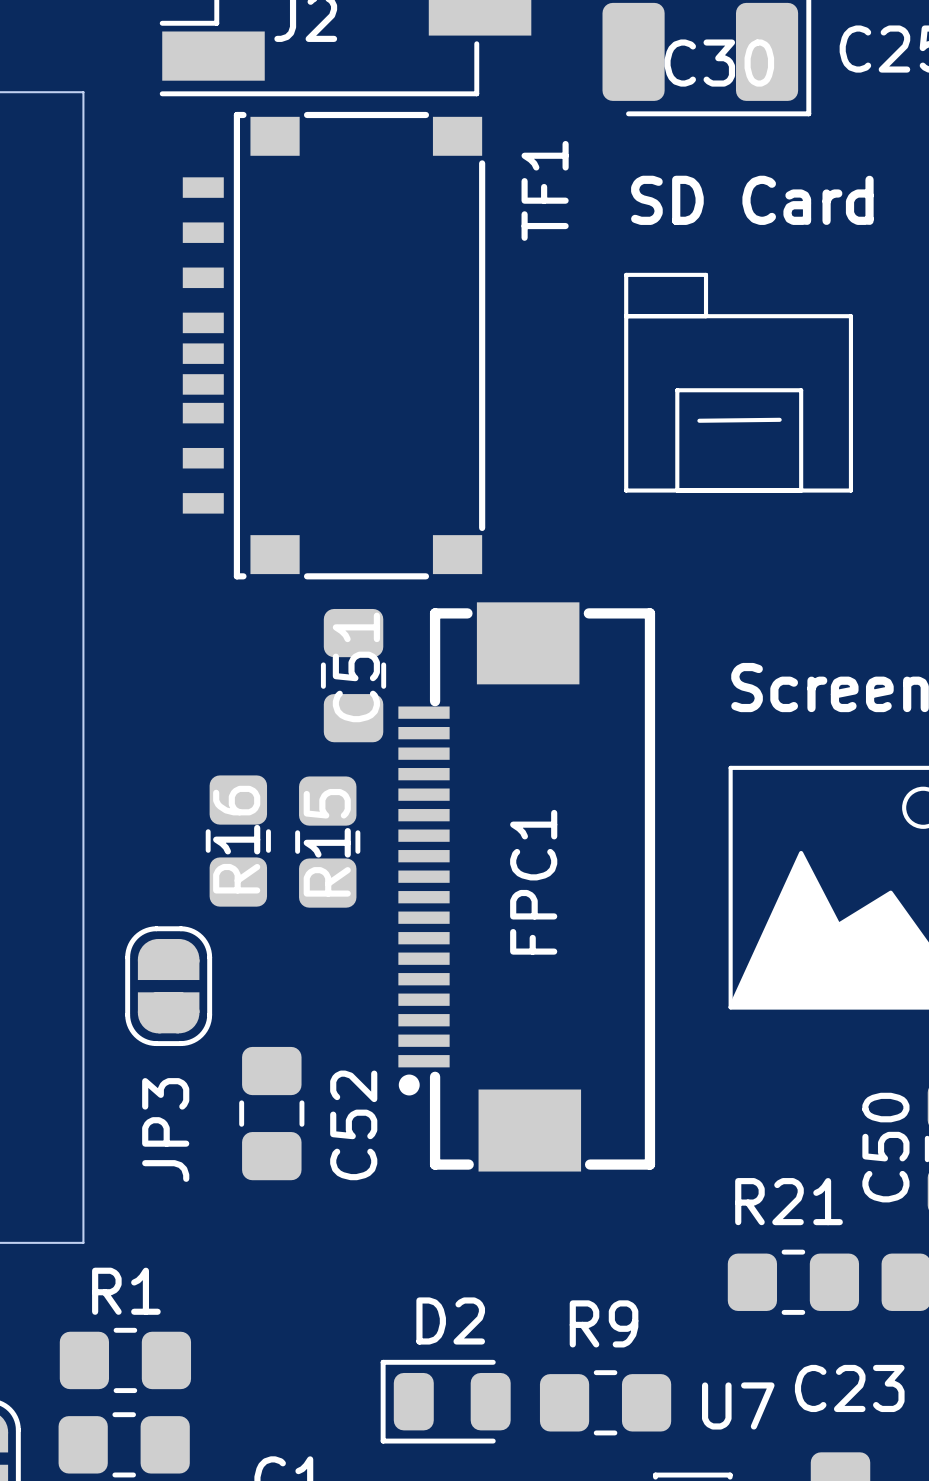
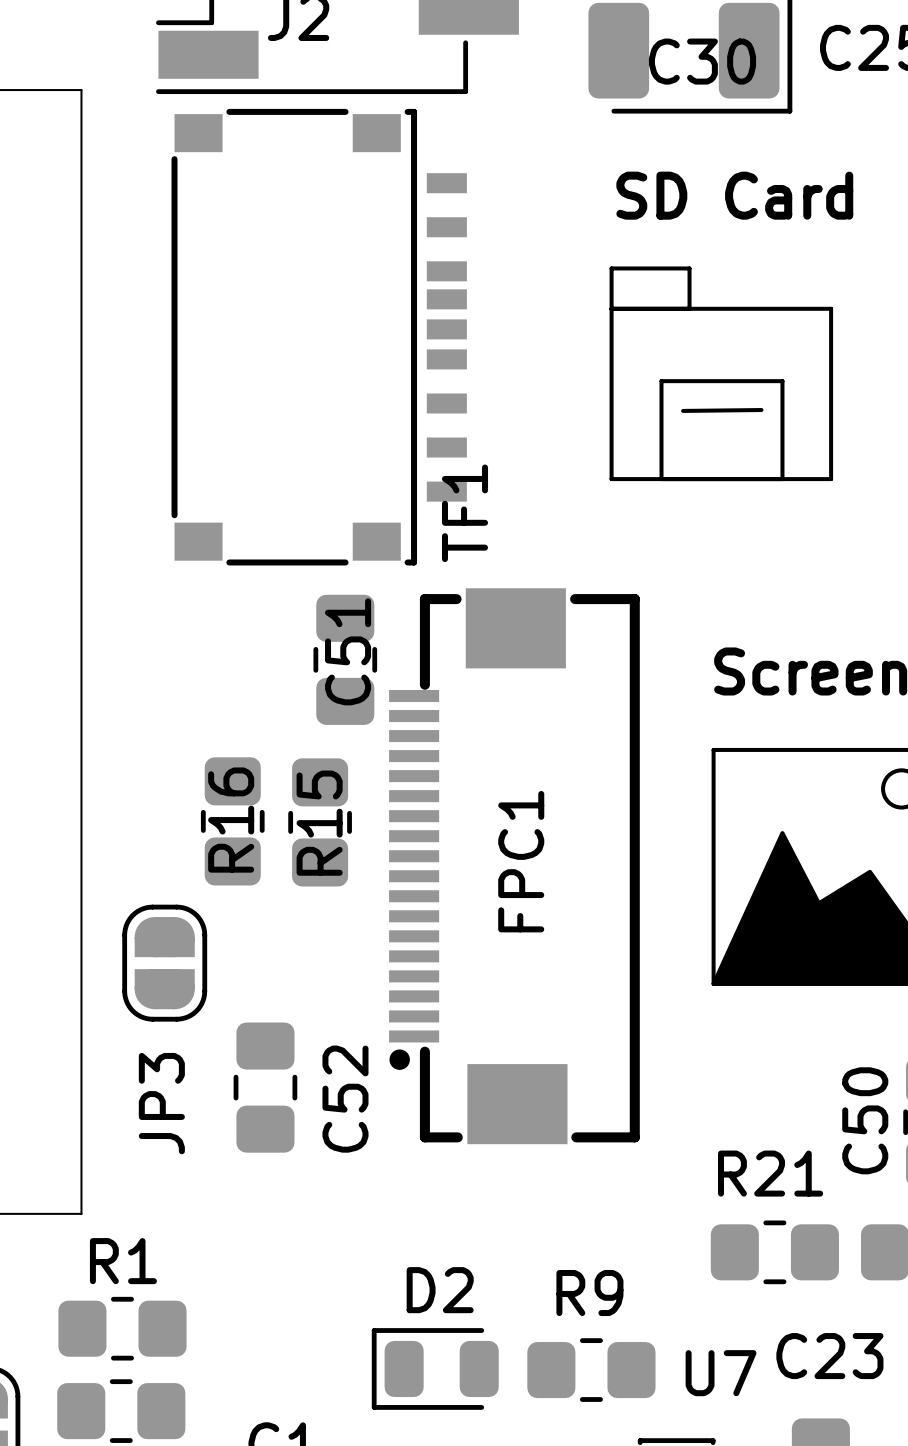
TF1 name position: TF1 (545, 190) -> TF1 (465, 513)
TF1 rotation: 0° (334, 345) -> 180° (319, 337)

